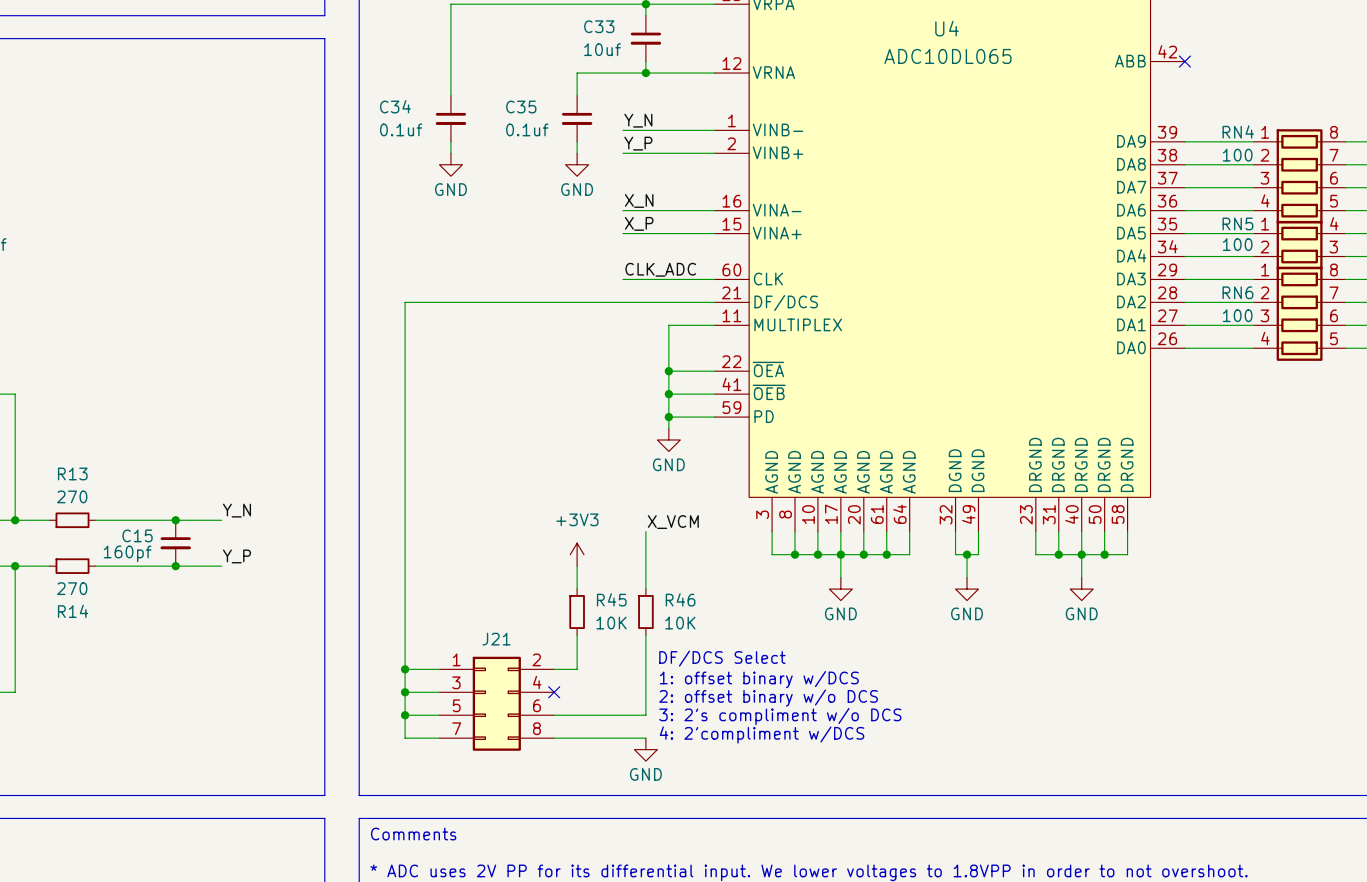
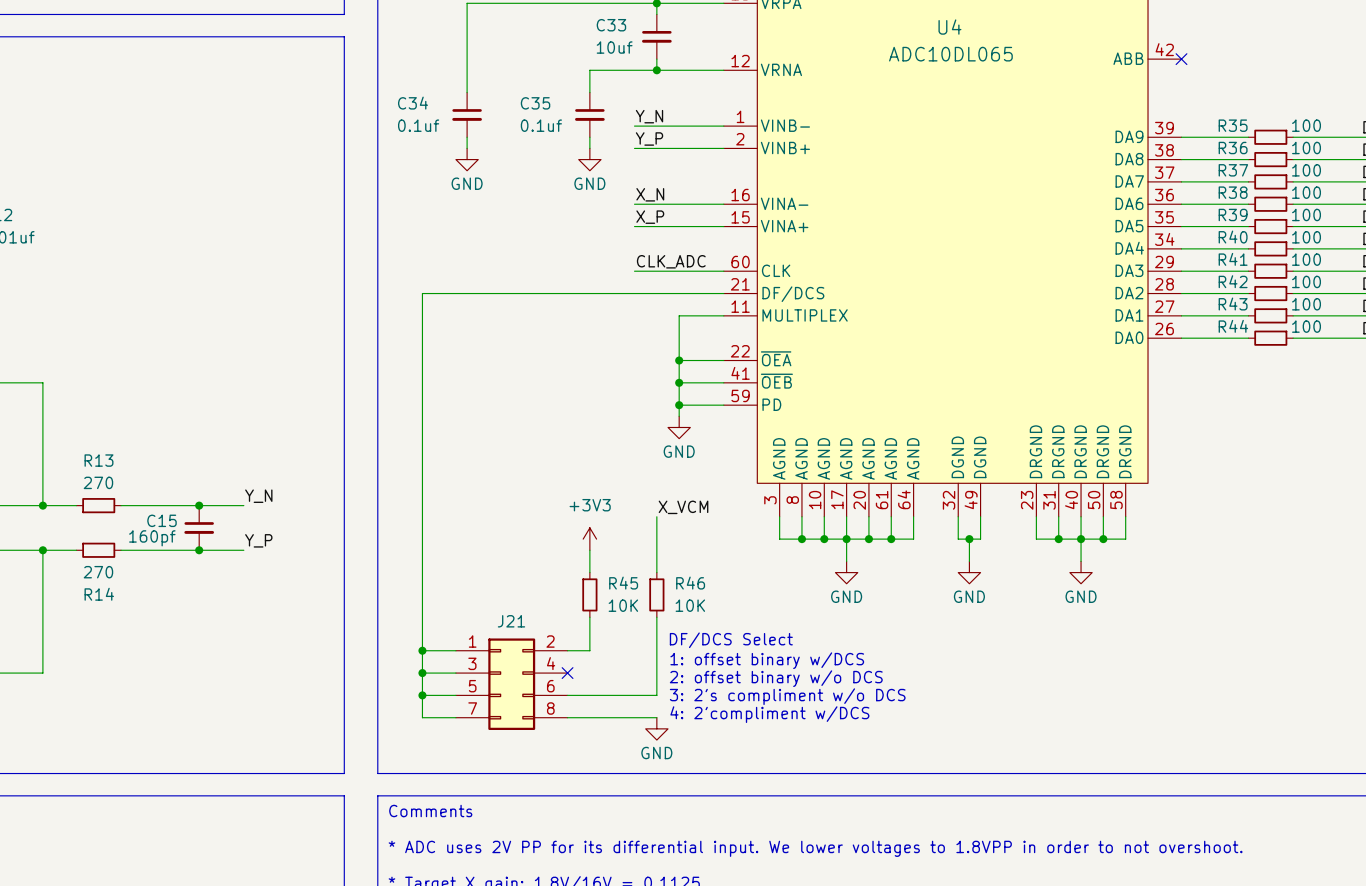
R35: none -> 100 (1270, 137)
R36: none -> 100 (1270, 159)
RN4: 100 (1299, 176) -> none
R37: none -> 100 (1270, 181)
R38: none -> 100 (1270, 204)
R39: none -> 100 (1270, 226)
RN5: 100 (1299, 245) -> none
R40: none -> 100 (1270, 248)
R41: none -> 100 (1270, 271)
R42: none -> 100 (1270, 293)
RN6: 100 (1299, 313) -> none
R43: none -> 100 (1270, 315)
R44: none -> 100 (1270, 338)

